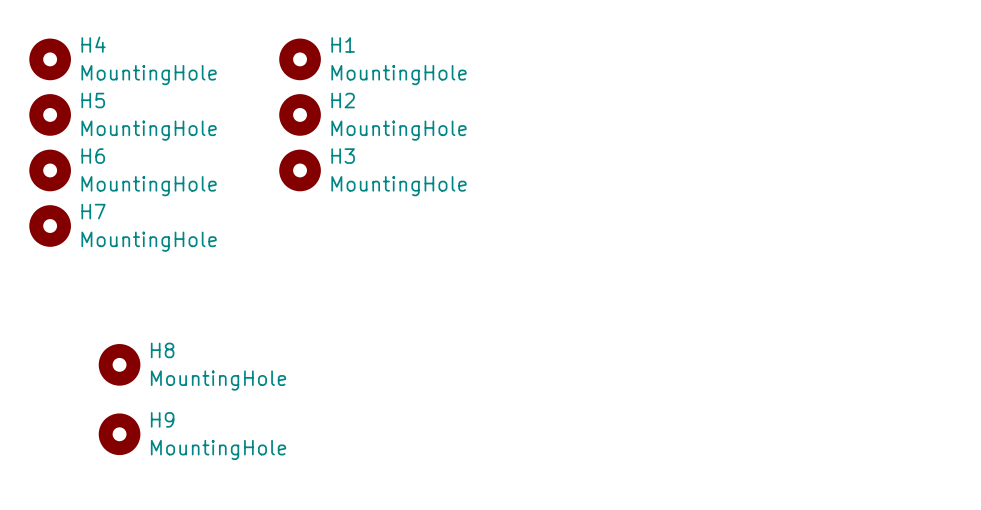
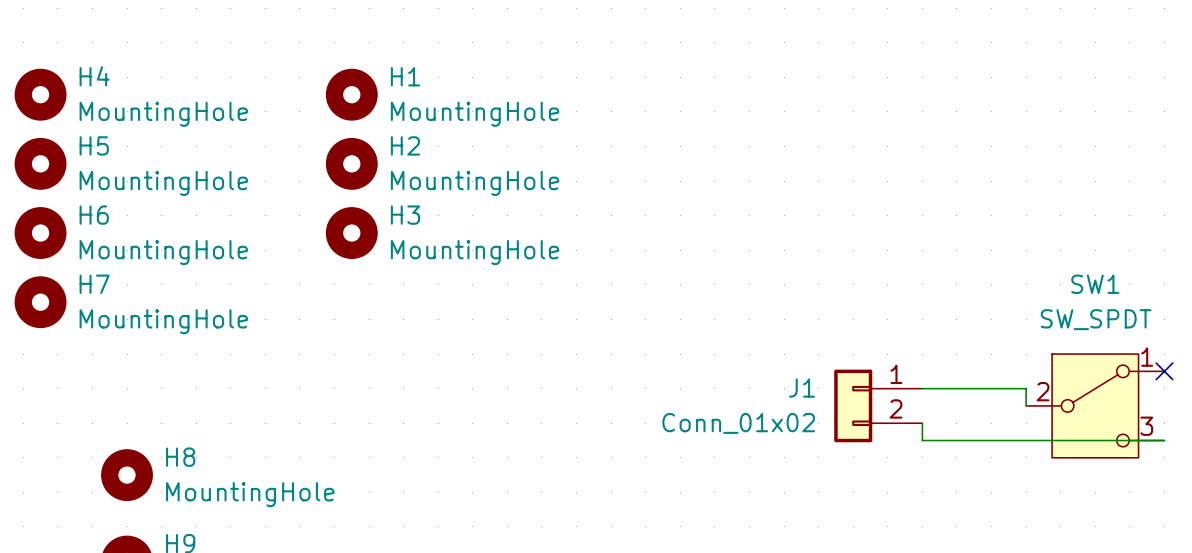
no-connect mark: none -> (1164, 371)
wire: none -> (922, 388) (1026, 388) (1026, 405)
J1: none -> Conn_01x02 (878, 405)
SW1: none -> SW_SPDT (1095, 405)
wire: none -> (922, 423) (922, 440) (1164, 440)

